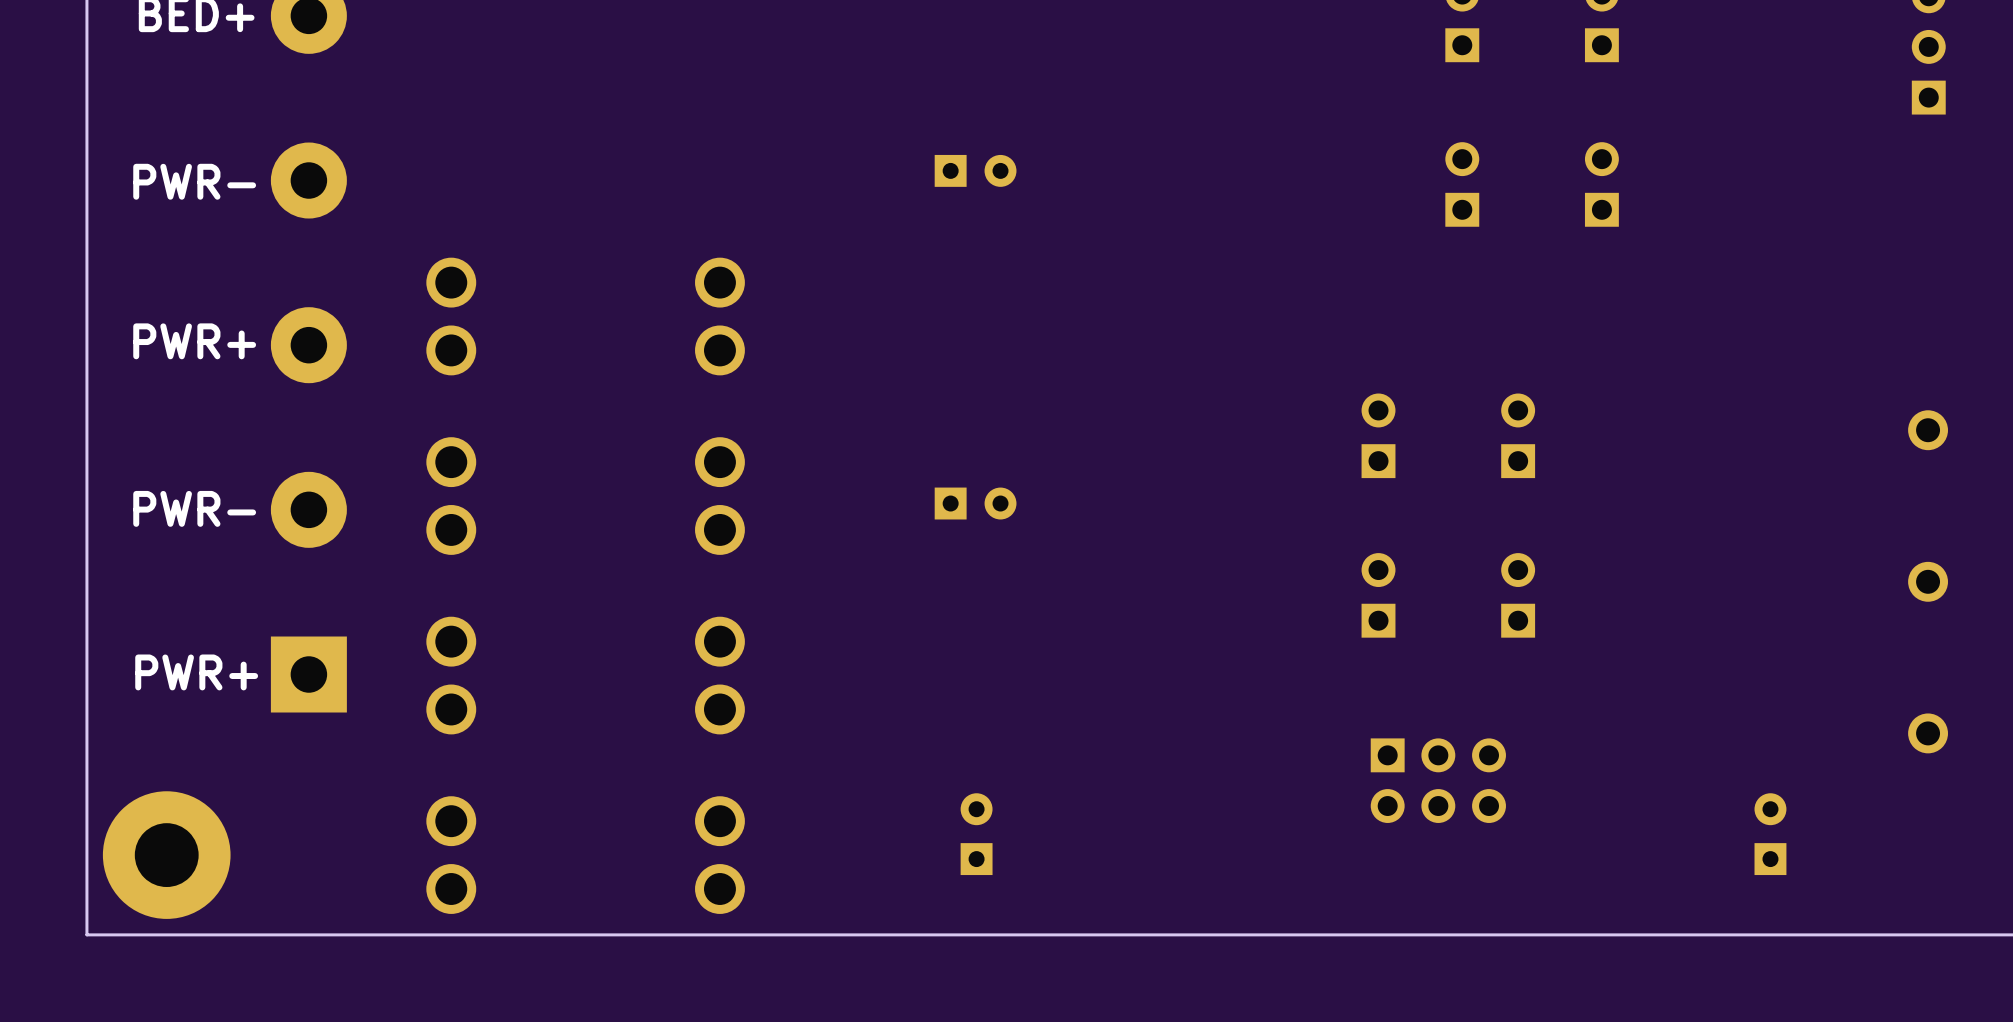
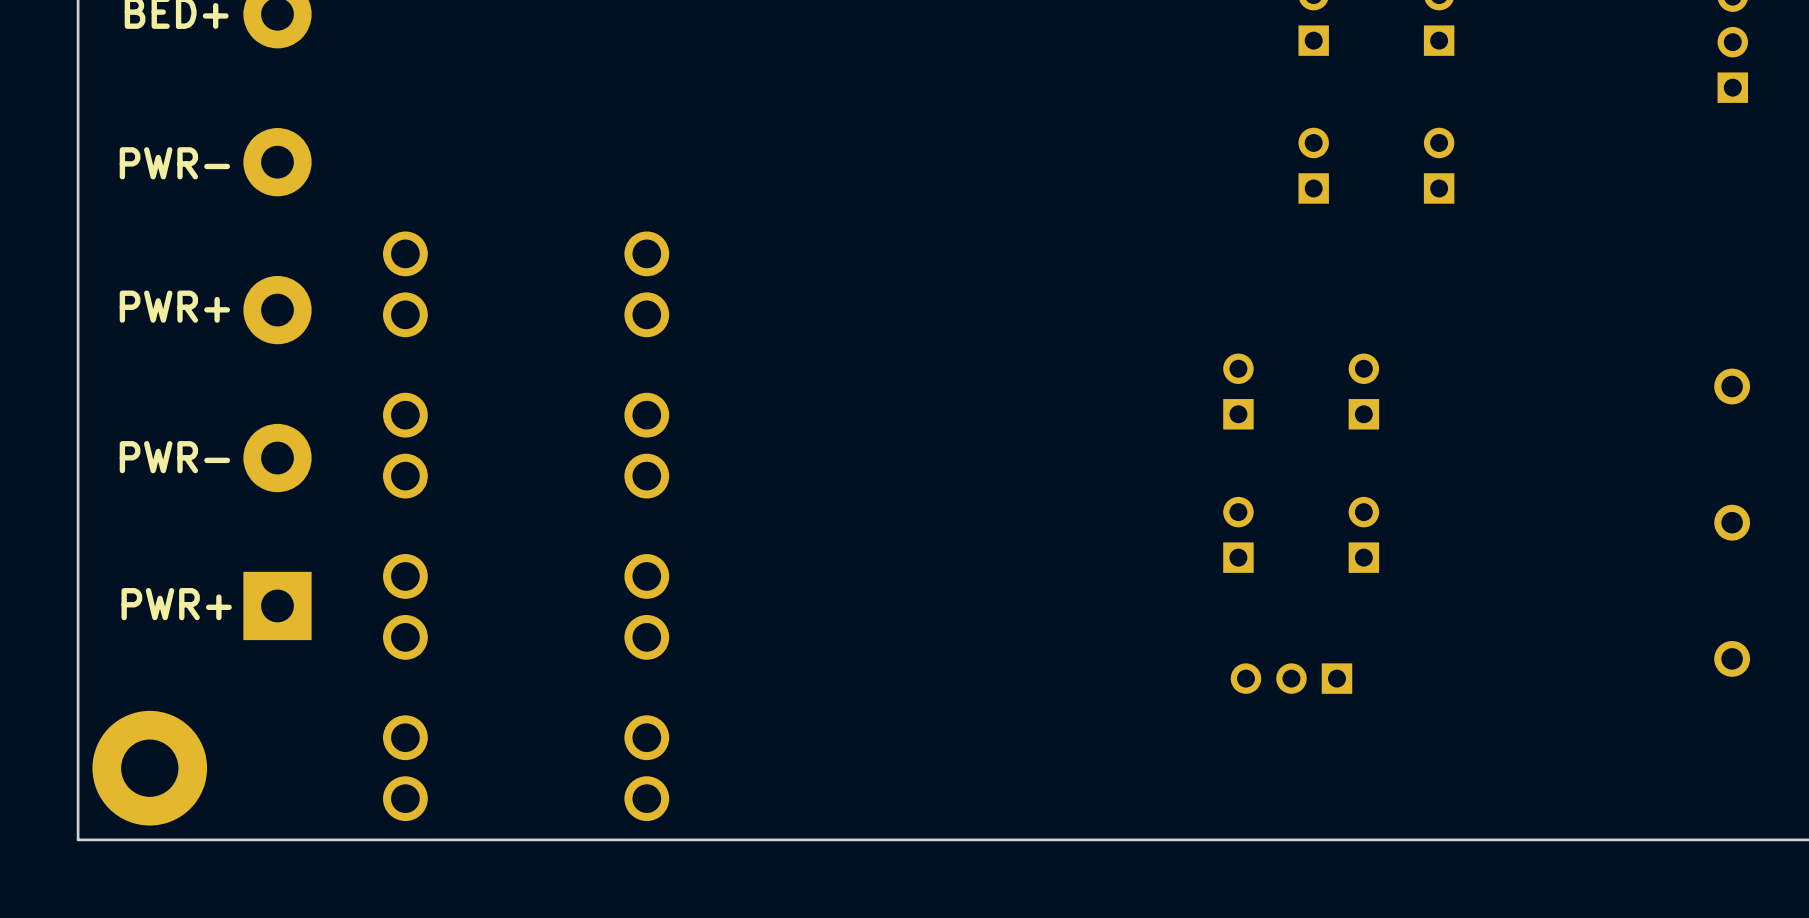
part: (975, 170) -> none
part: (975, 503) -> none
part: none -> (1291, 678)
part: (1438, 780) -> none
part: (976, 834) -> none
part: (1770, 834) -> none

